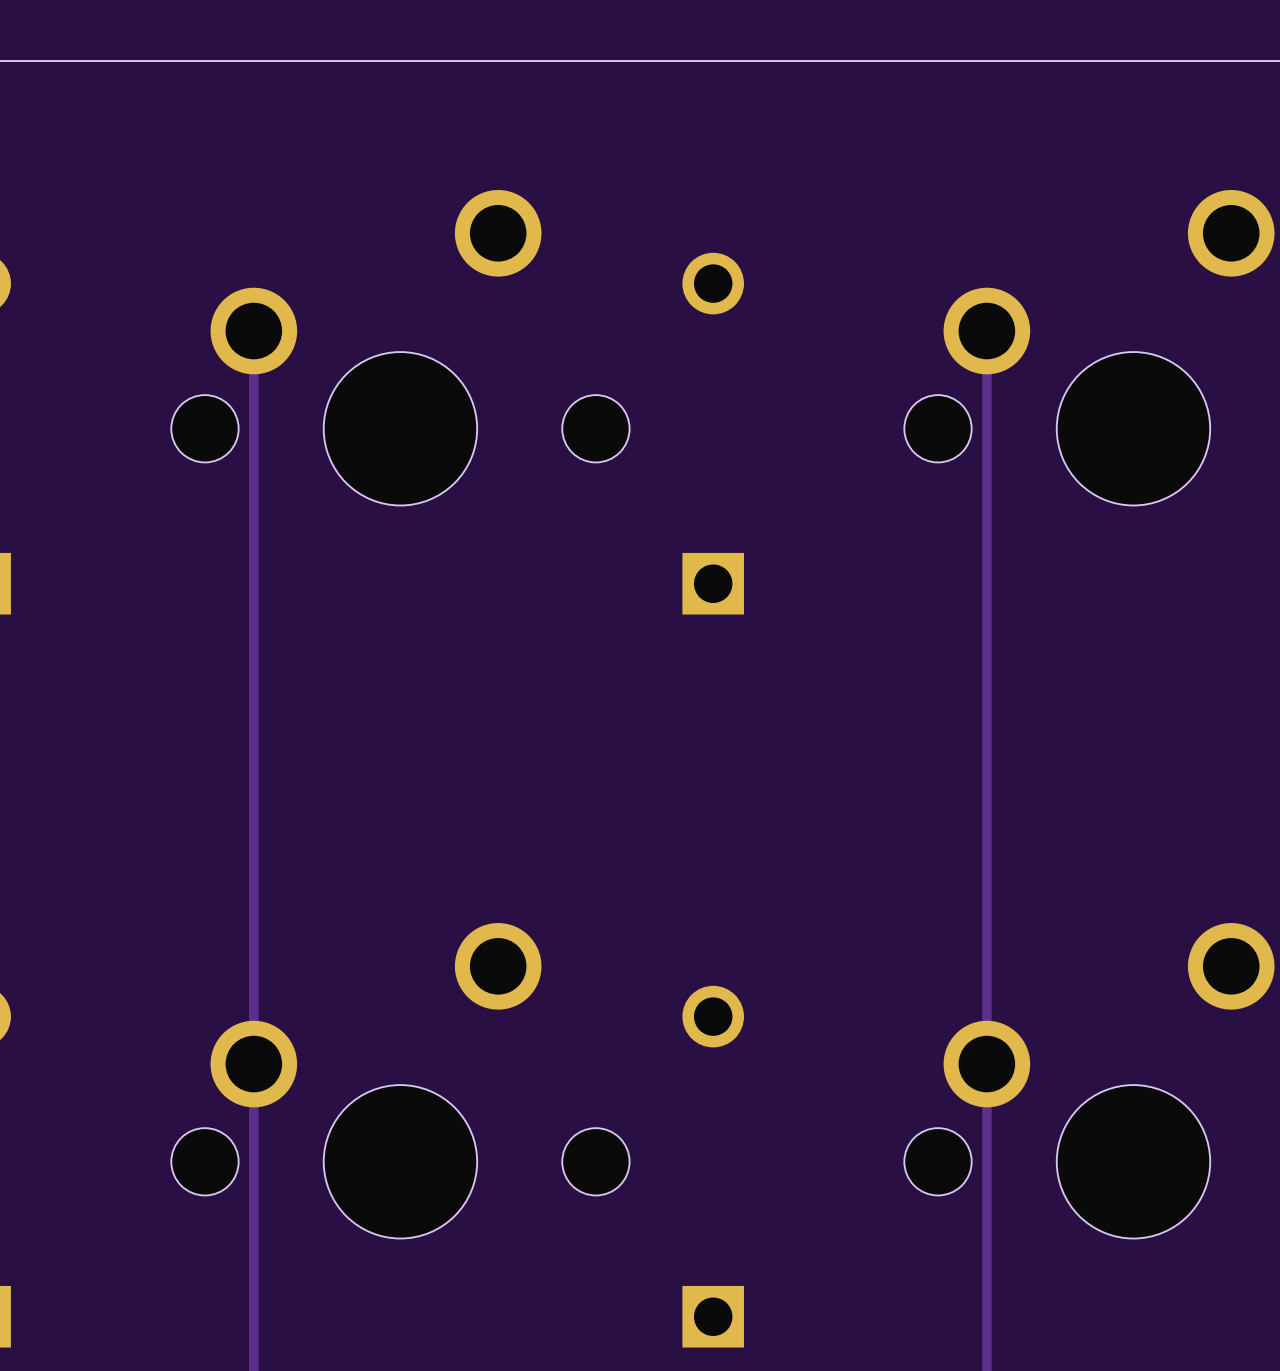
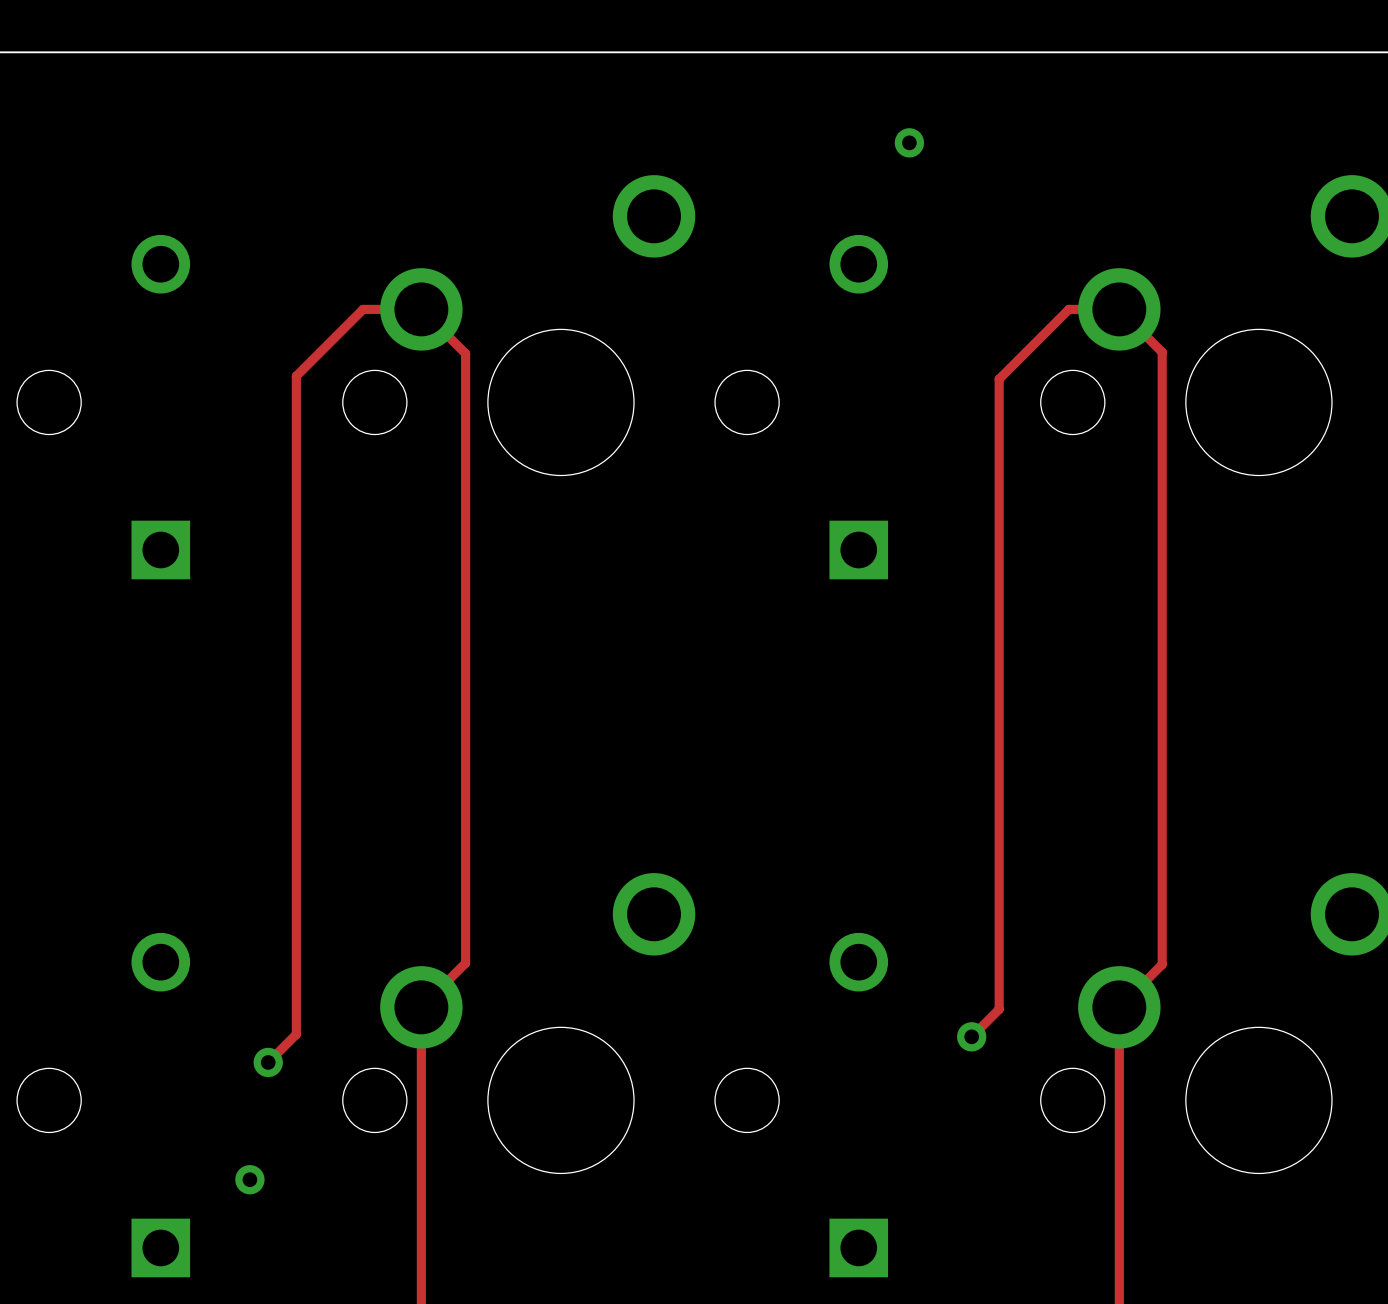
via: none -> (909, 142)
track: (253, 331) (253, 1064) -> (268, 1062) (296, 1034) (296, 376) (363, 309) (421, 309) (465, 353) (465, 963) (421, 1007)
track: (986, 331) (986, 1064) -> (971, 1036) (999, 1009) (999, 379) (1068, 309) (1119, 309) (1162, 352) (1162, 964) (1119, 1007)
via: none -> (971, 1036)
via: none -> (268, 1062)
via: none -> (249, 1179)

